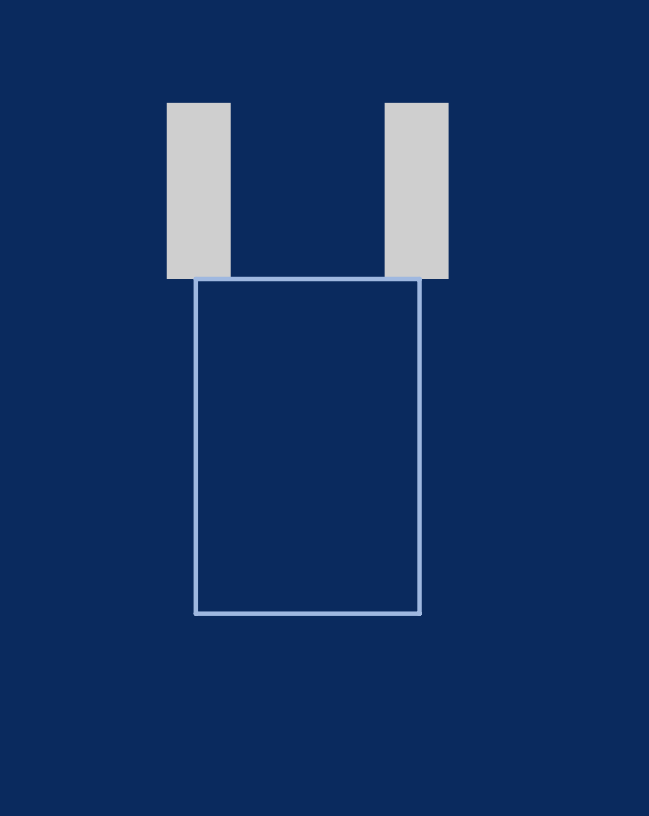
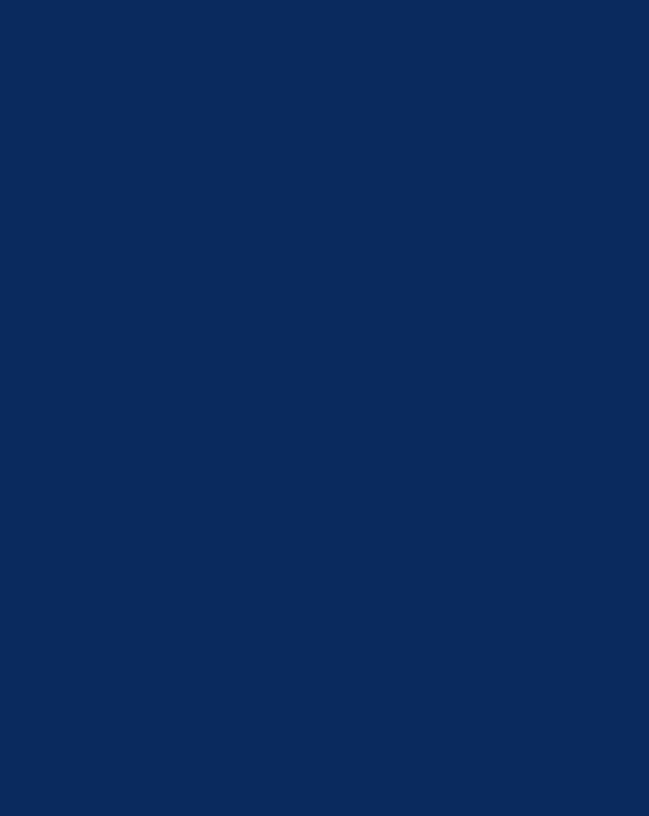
part: (307, 359) -> none

